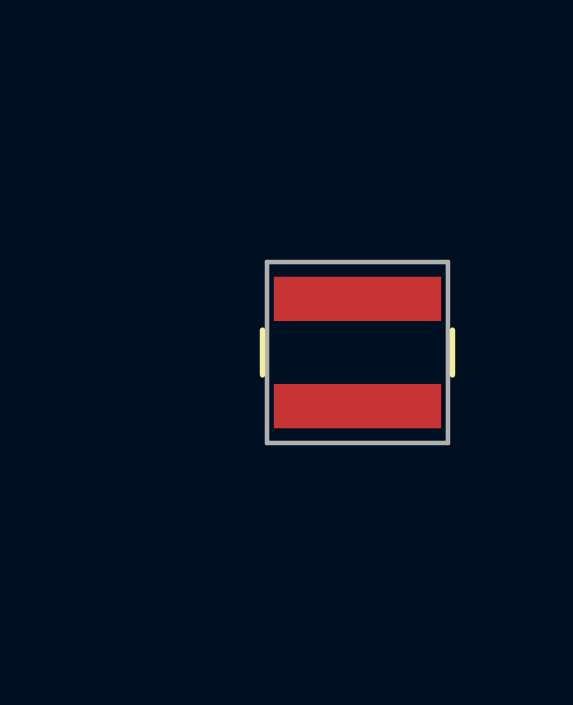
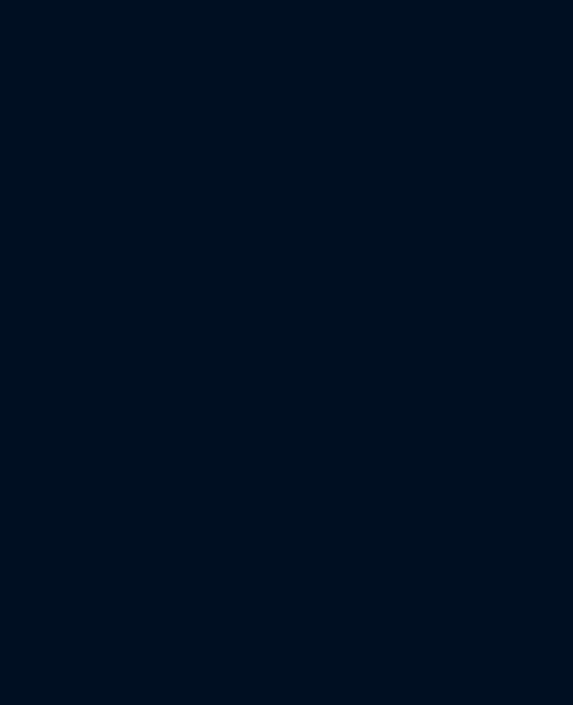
part: (357, 352) -> none

